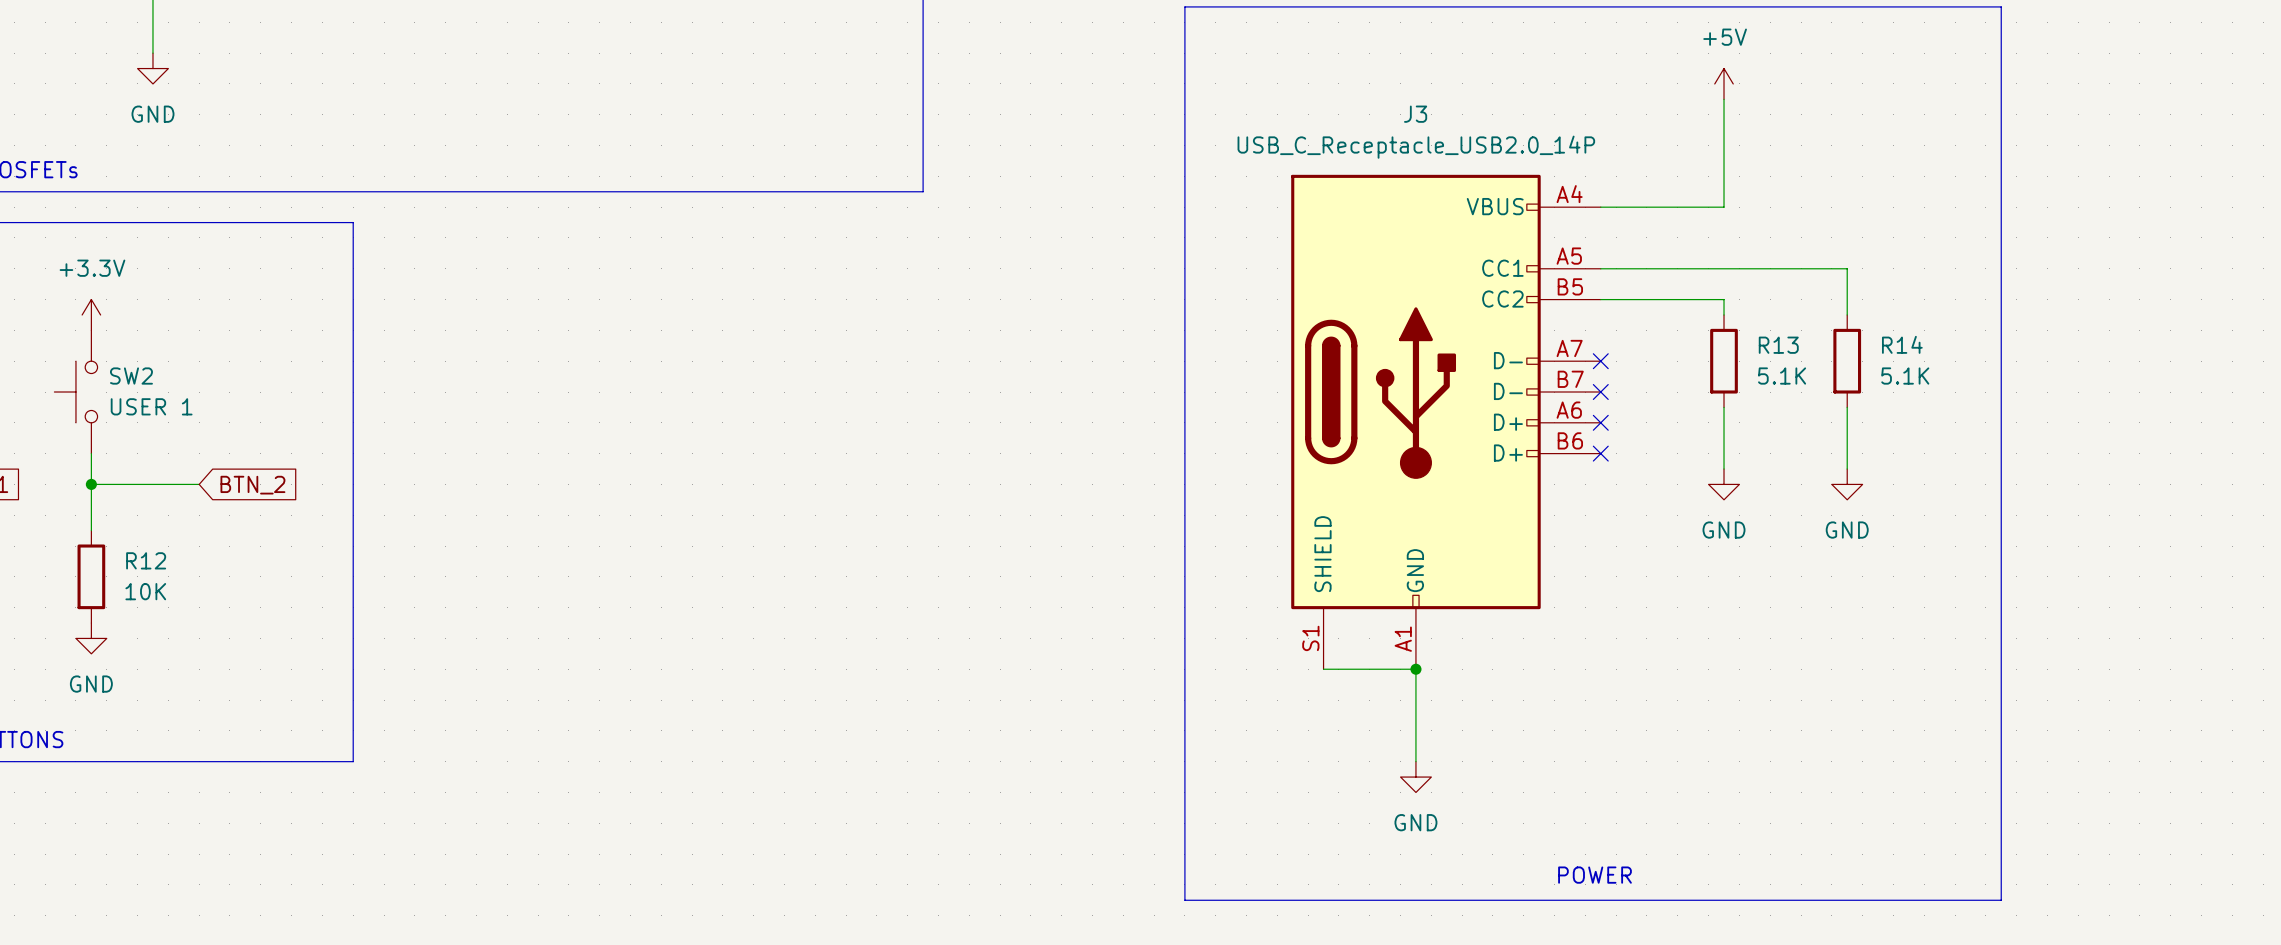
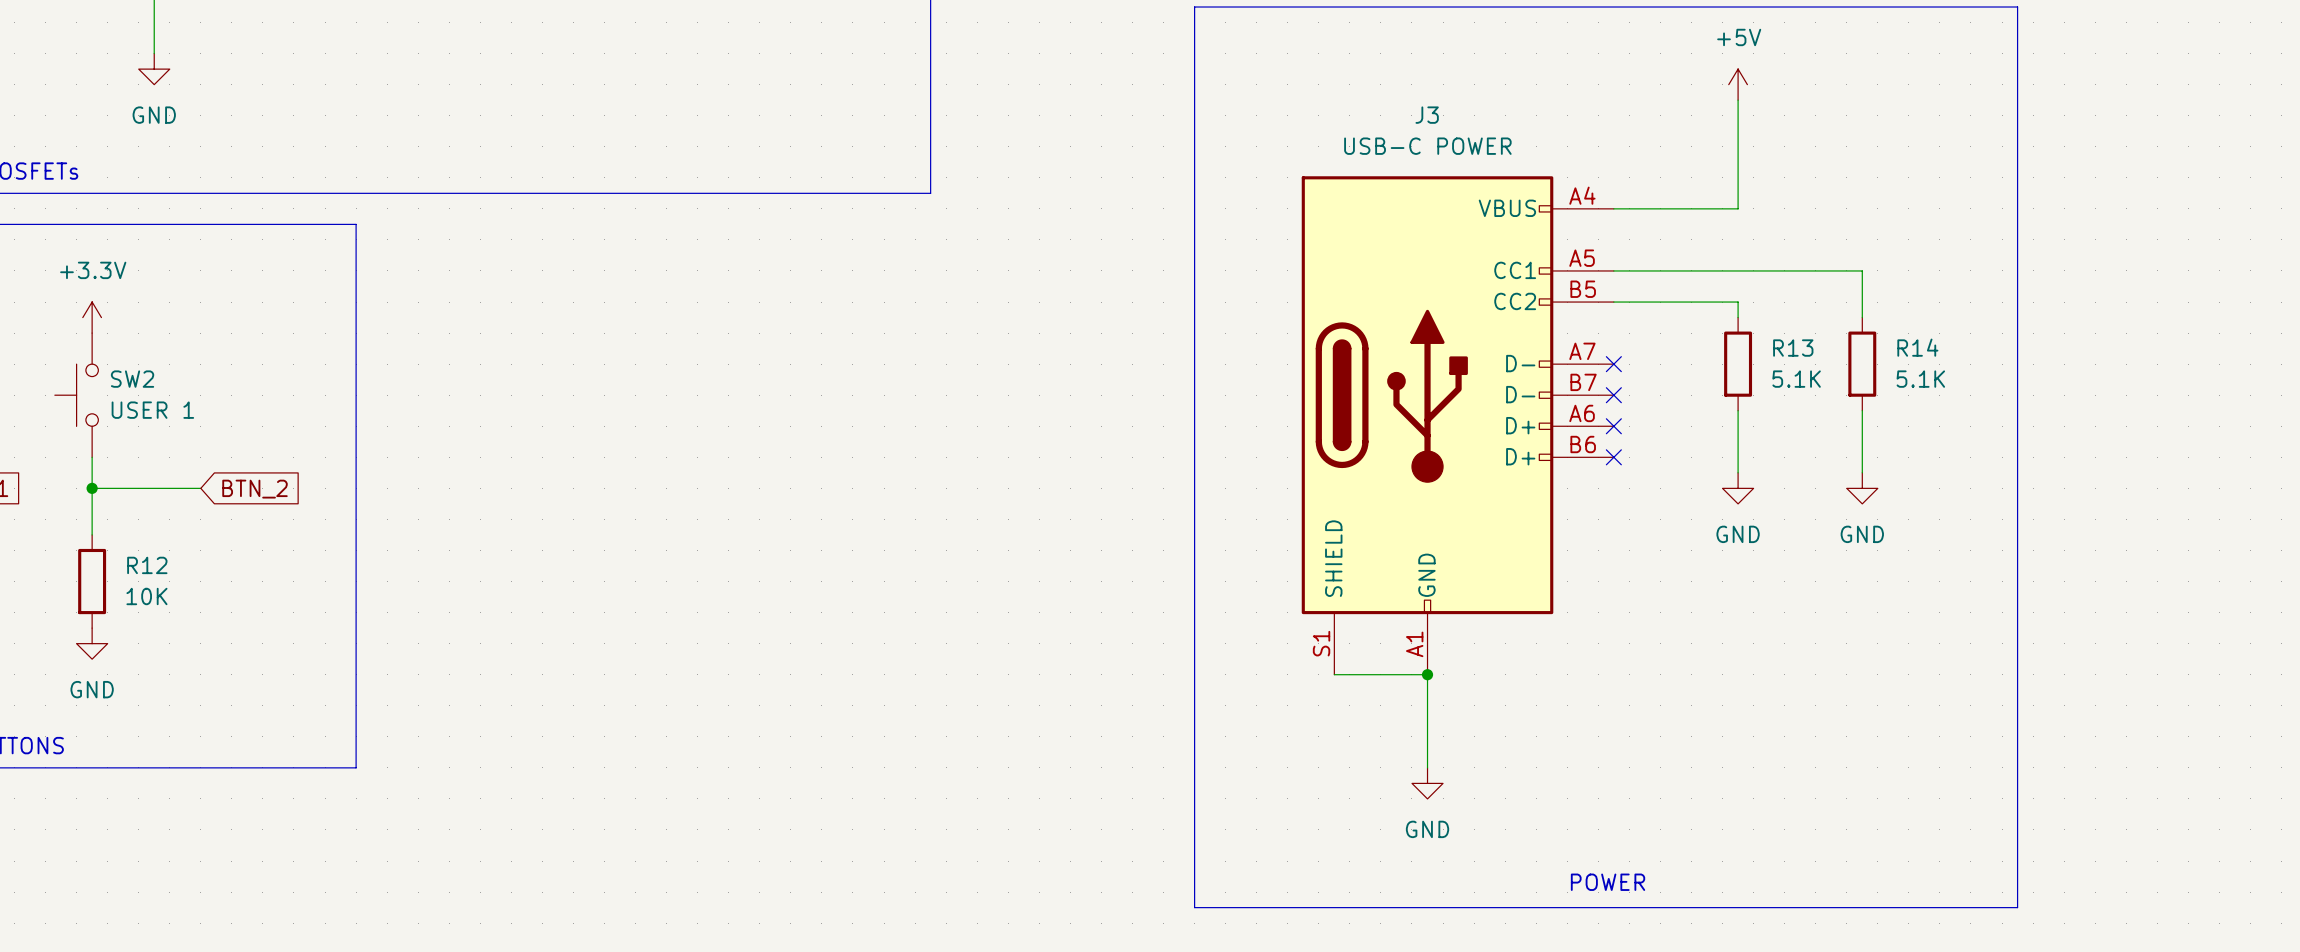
J3 value: USB_C_Receptacle_USB2.0_14P (1416, 147) -> USB-C POWER (1427, 146)

